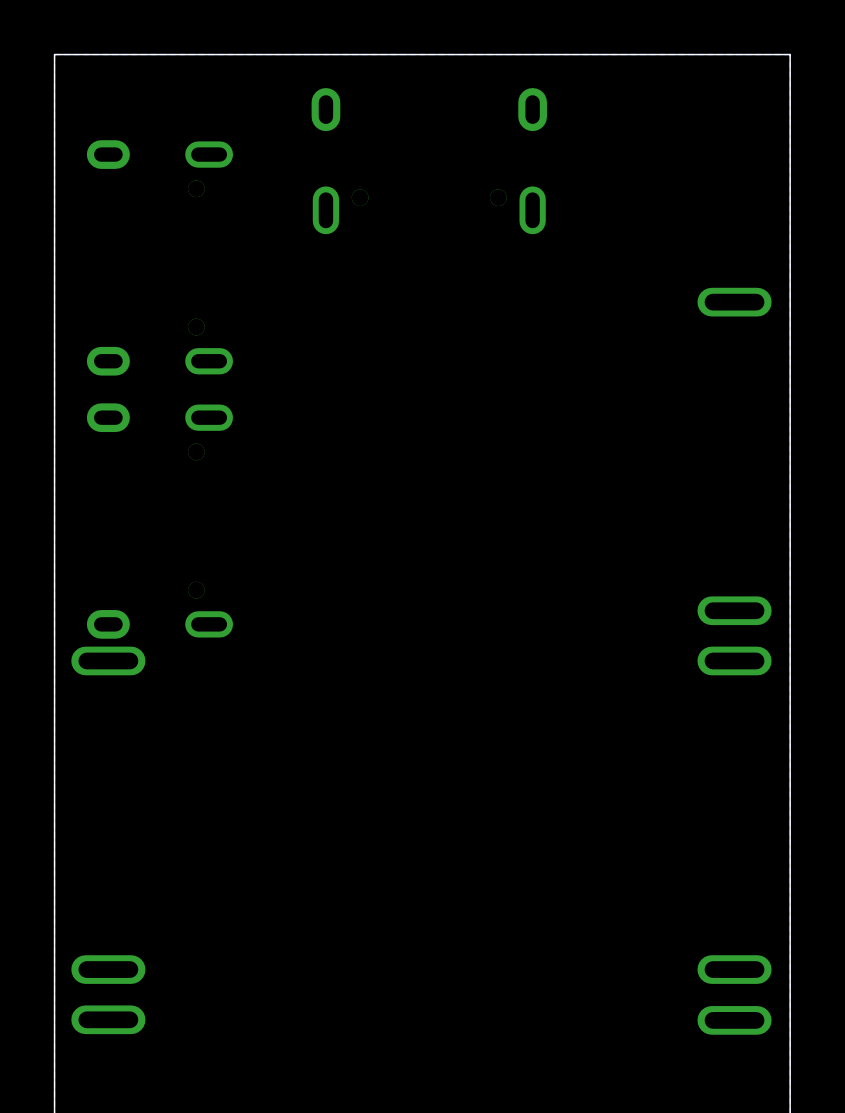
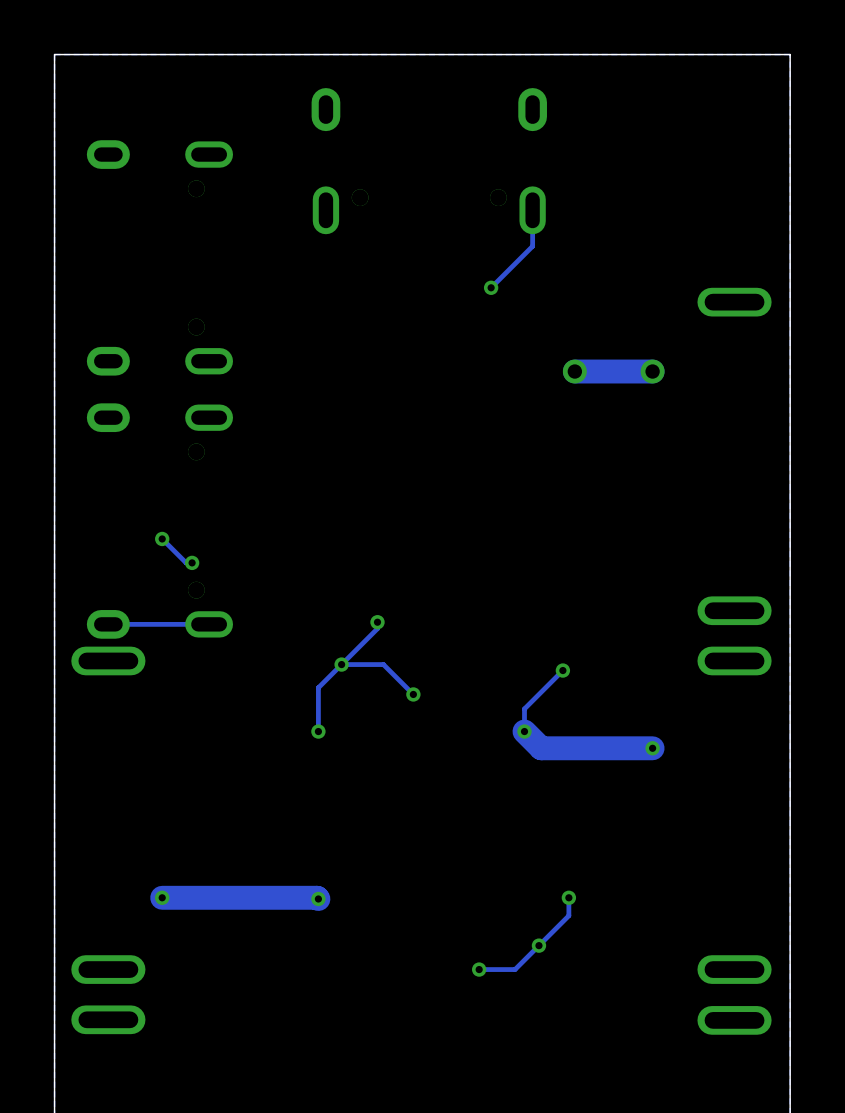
track: none -> (532, 210) (532, 246) (491, 287)
via: none -> (491, 287)
via: none -> (574, 371)
track: none -> (652, 371) (574, 371)
via: none -> (652, 371)
track: none -> (162, 538) (186, 562) (192, 562)
via: none -> (162, 538)
via: none -> (192, 562)
track: none -> (377, 622) (377, 628) (318, 687) (318, 731)
via: none -> (377, 622)
track: none -> (209, 624) (108, 624)
track: none -> (341, 664) (383, 664) (413, 694)
via: none -> (341, 664)
track: none -> (562, 670) (524, 708) (524, 731) (541, 748) (652, 748)
via: none -> (562, 670)
via: none -> (413, 694)
via: none -> (318, 731)
via: none -> (524, 731)
via: none -> (652, 748)
track: none -> (162, 897) (318, 898)
via: none -> (162, 897)
track: none -> (568, 897) (568, 915) (515, 969) (479, 969)
via: none -> (568, 897)
via: none -> (318, 898)
via: none -> (538, 945)
via: none -> (479, 969)

